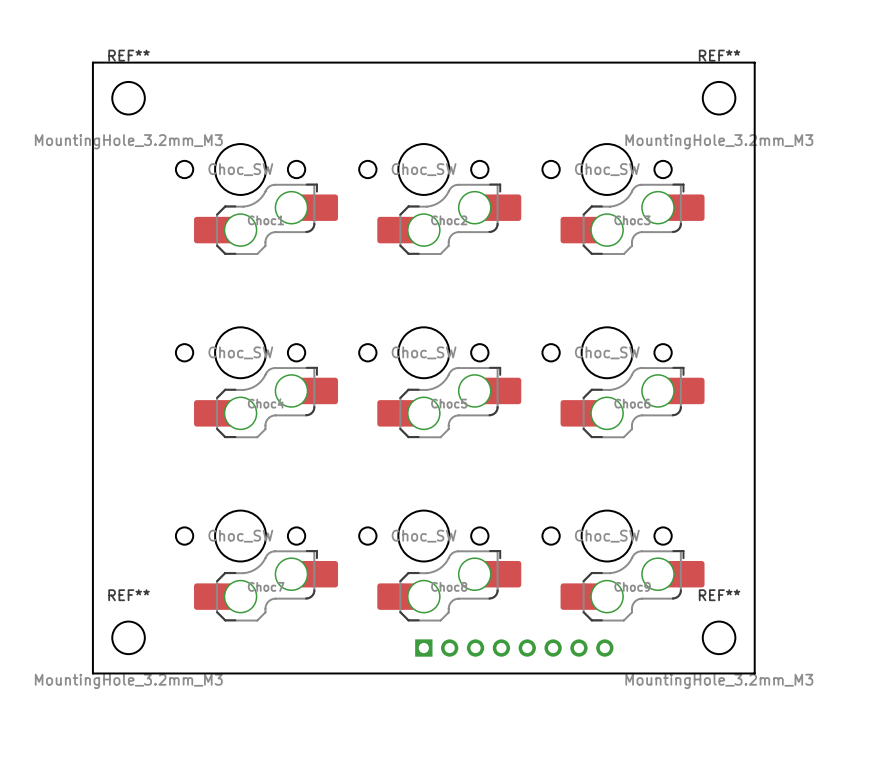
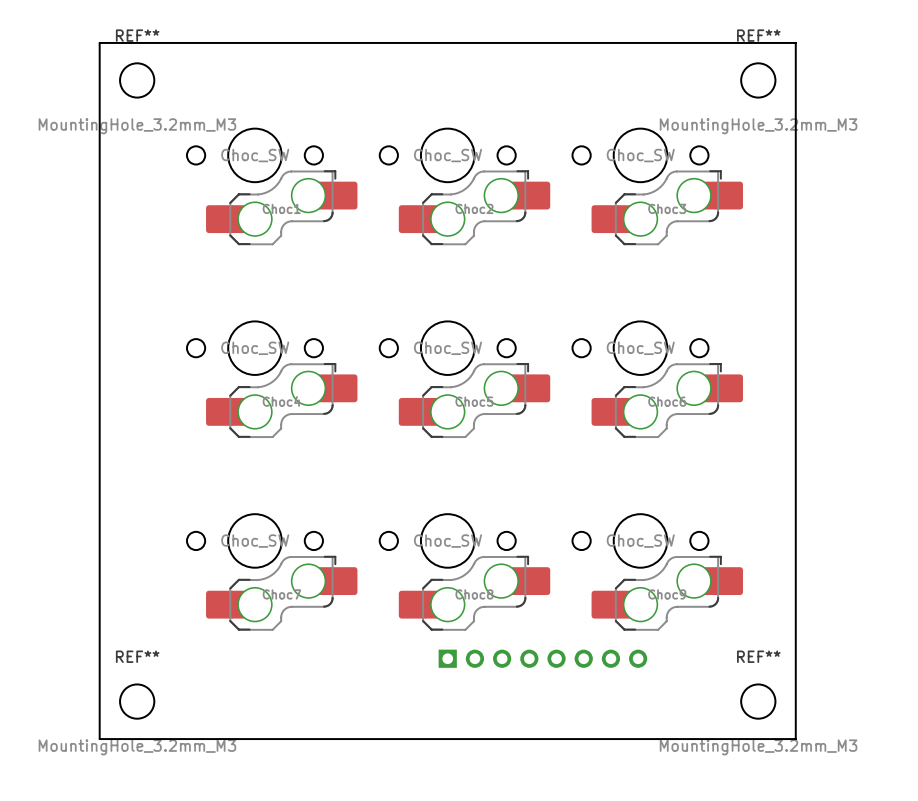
REF** position: (128, 637) -> (137, 701)
REF** position: (719, 637) -> (758, 701)
board edge: (92, 673) (754, 673) -> (99, 685) (99, 739) (795, 739) (795, 685)

